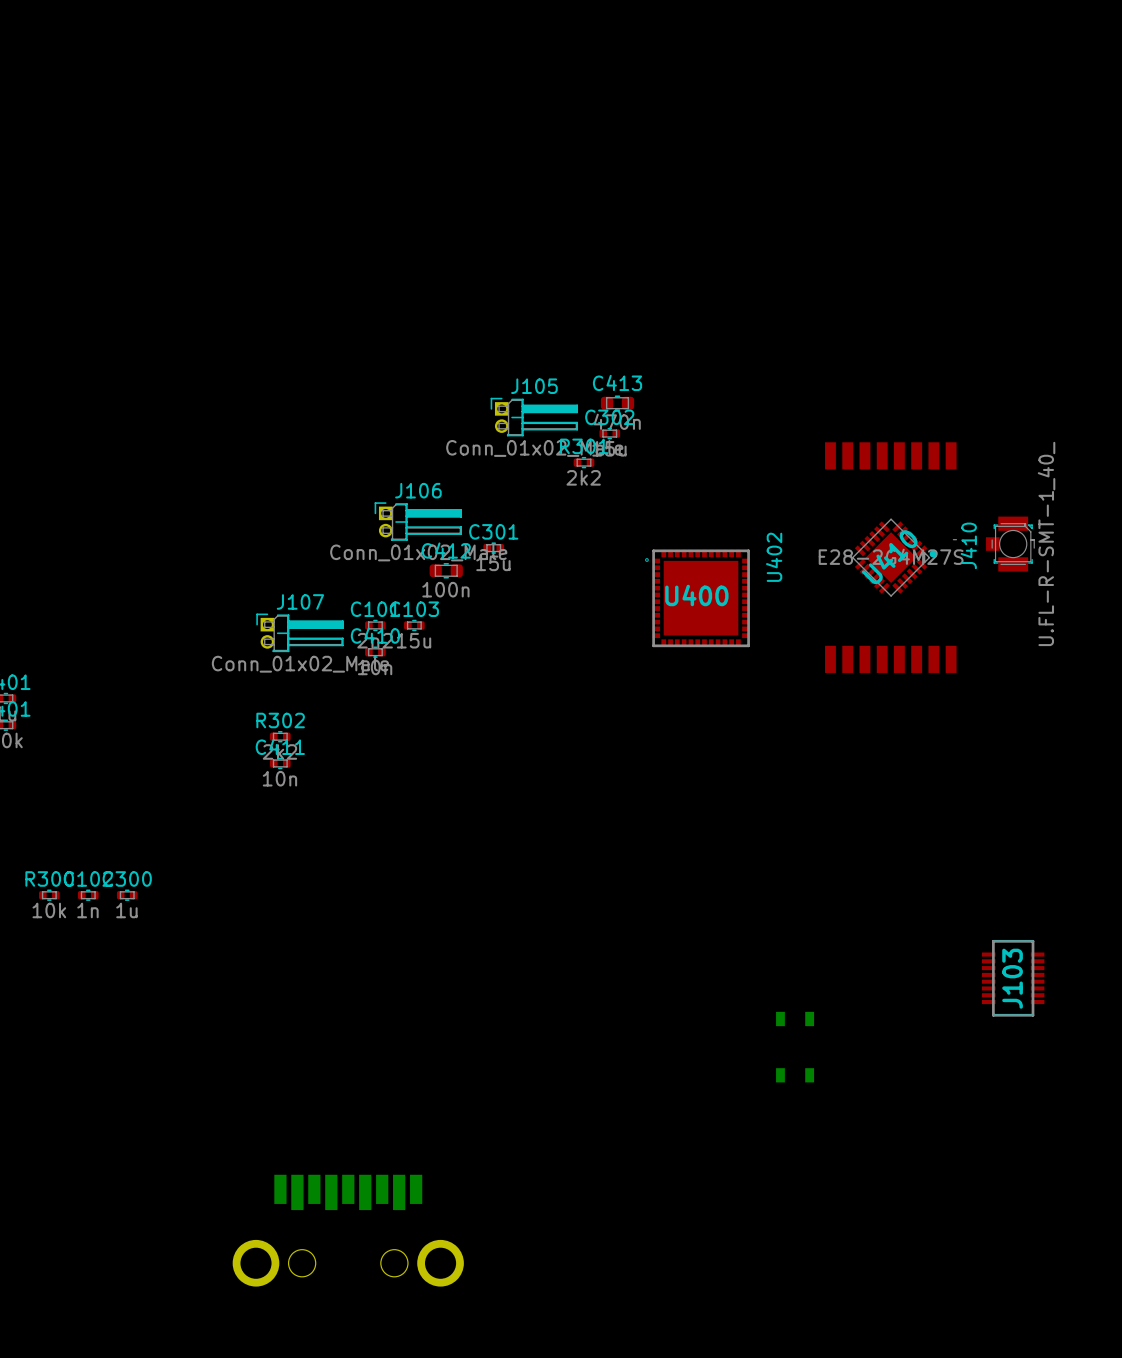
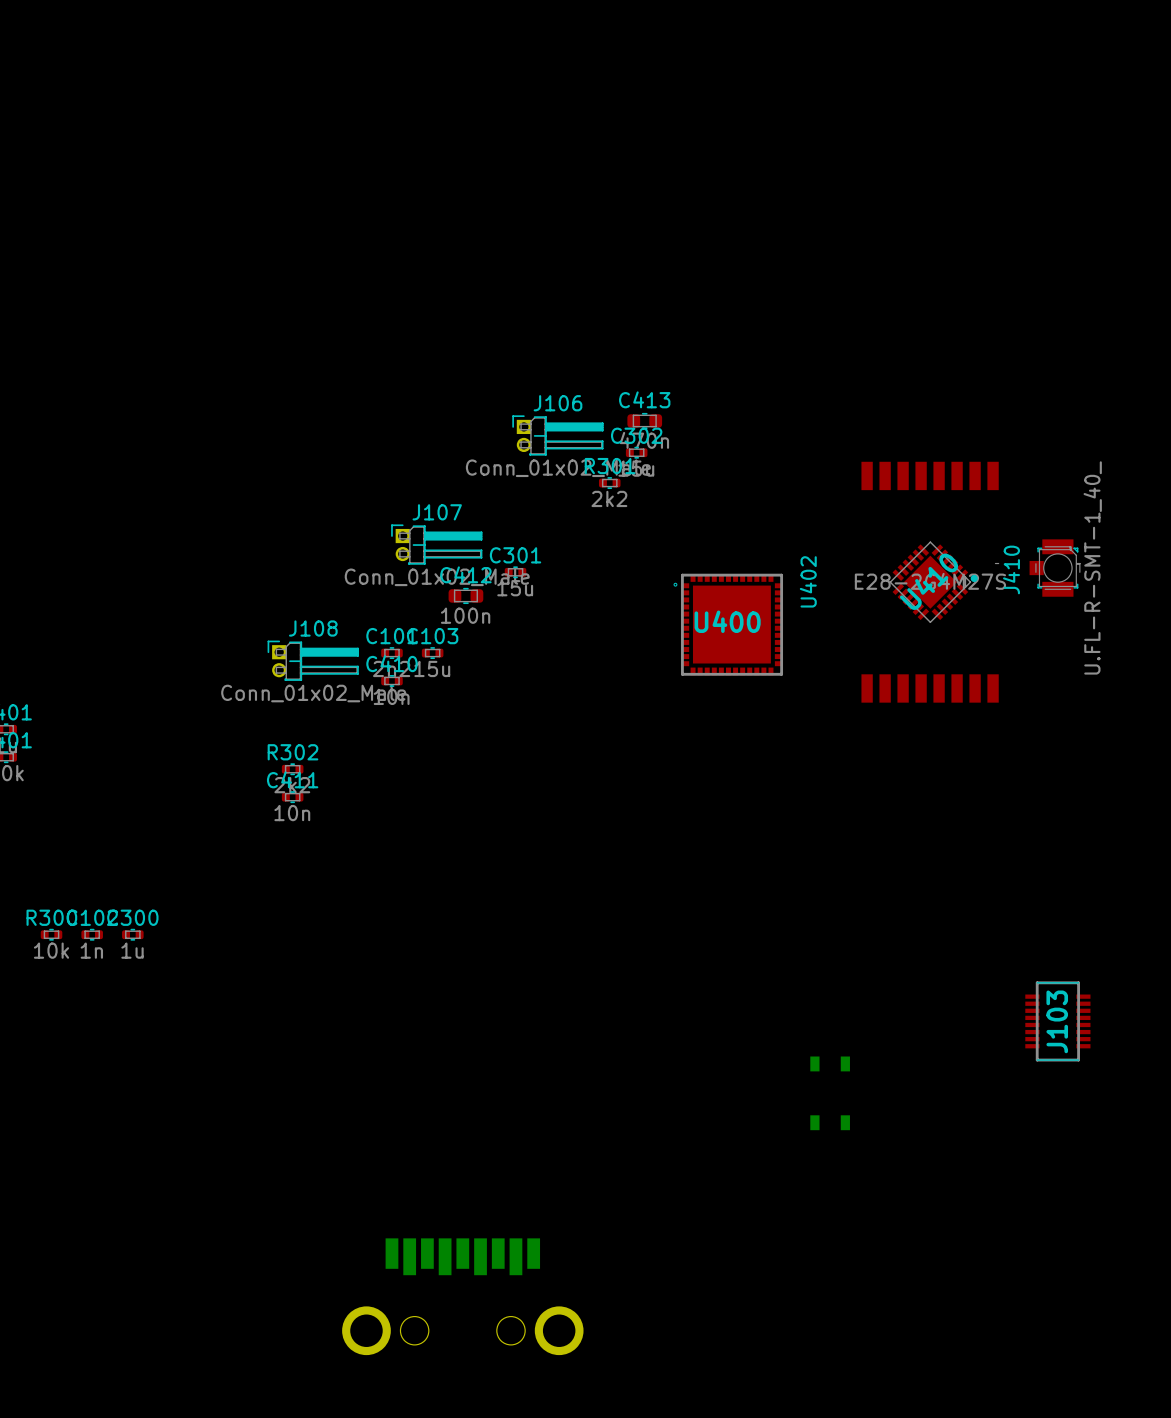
J105 name: J105 (534, 386) -> J106 (558, 403)
J106 name: J106 (418, 490) -> J107 (437, 512)
J107 name: J107 (300, 601) -> J108 (313, 628)
part position: (348, 1230) -> (462, 1296)

